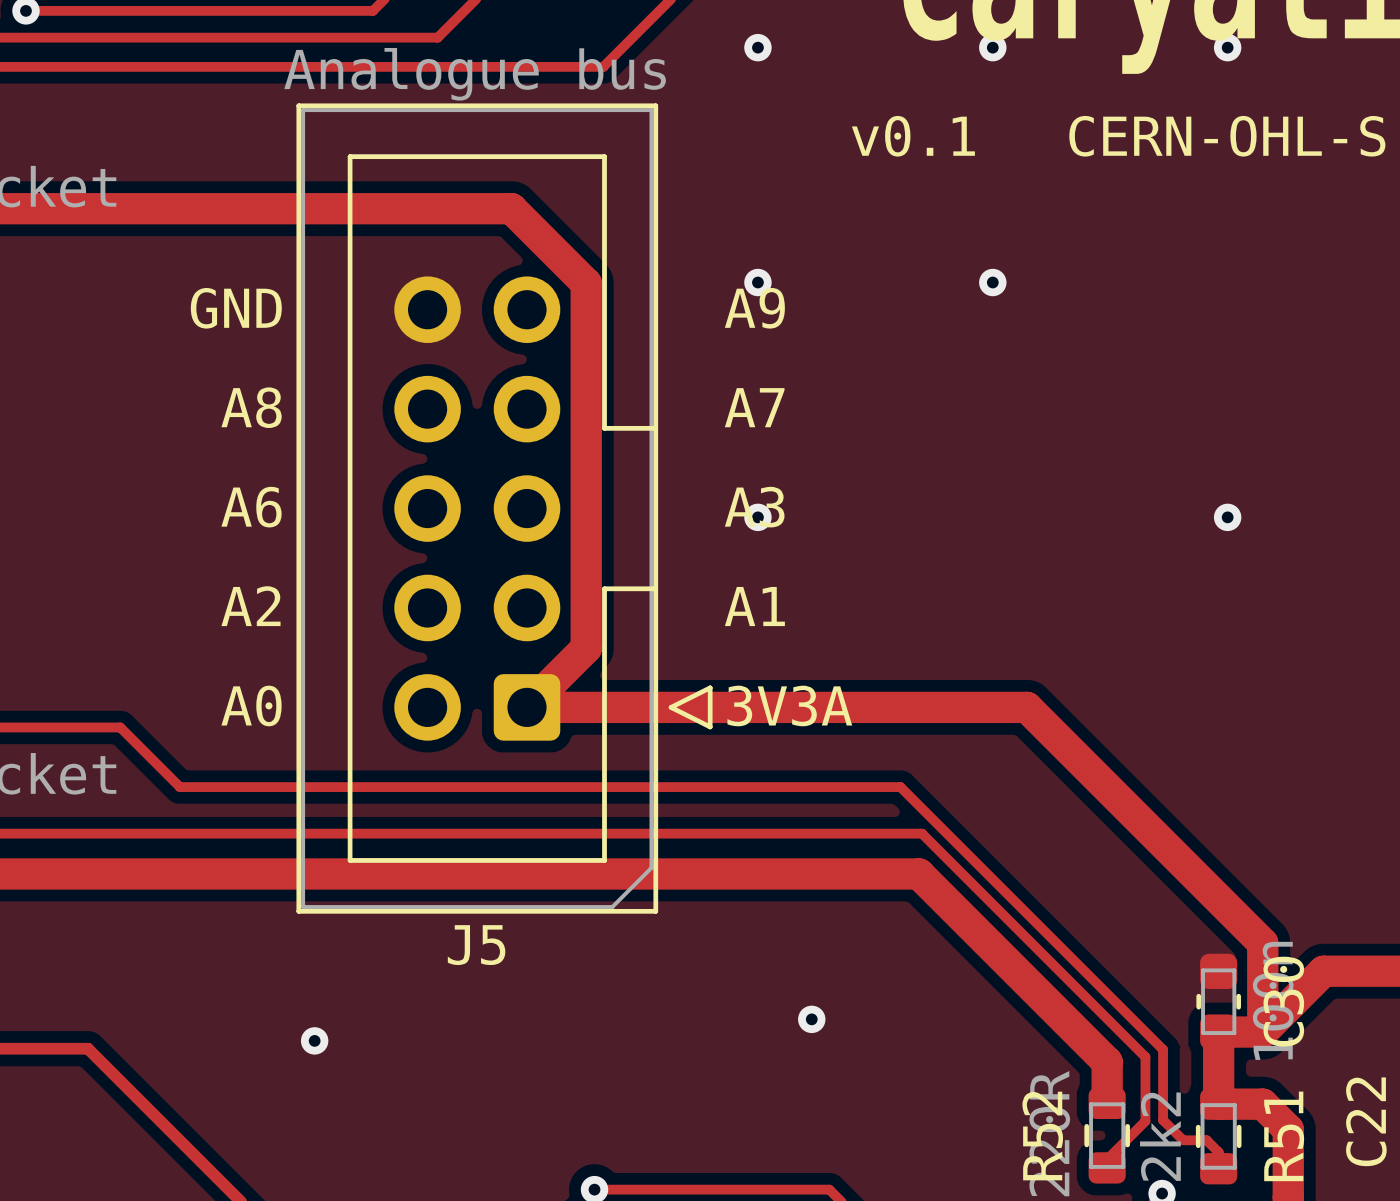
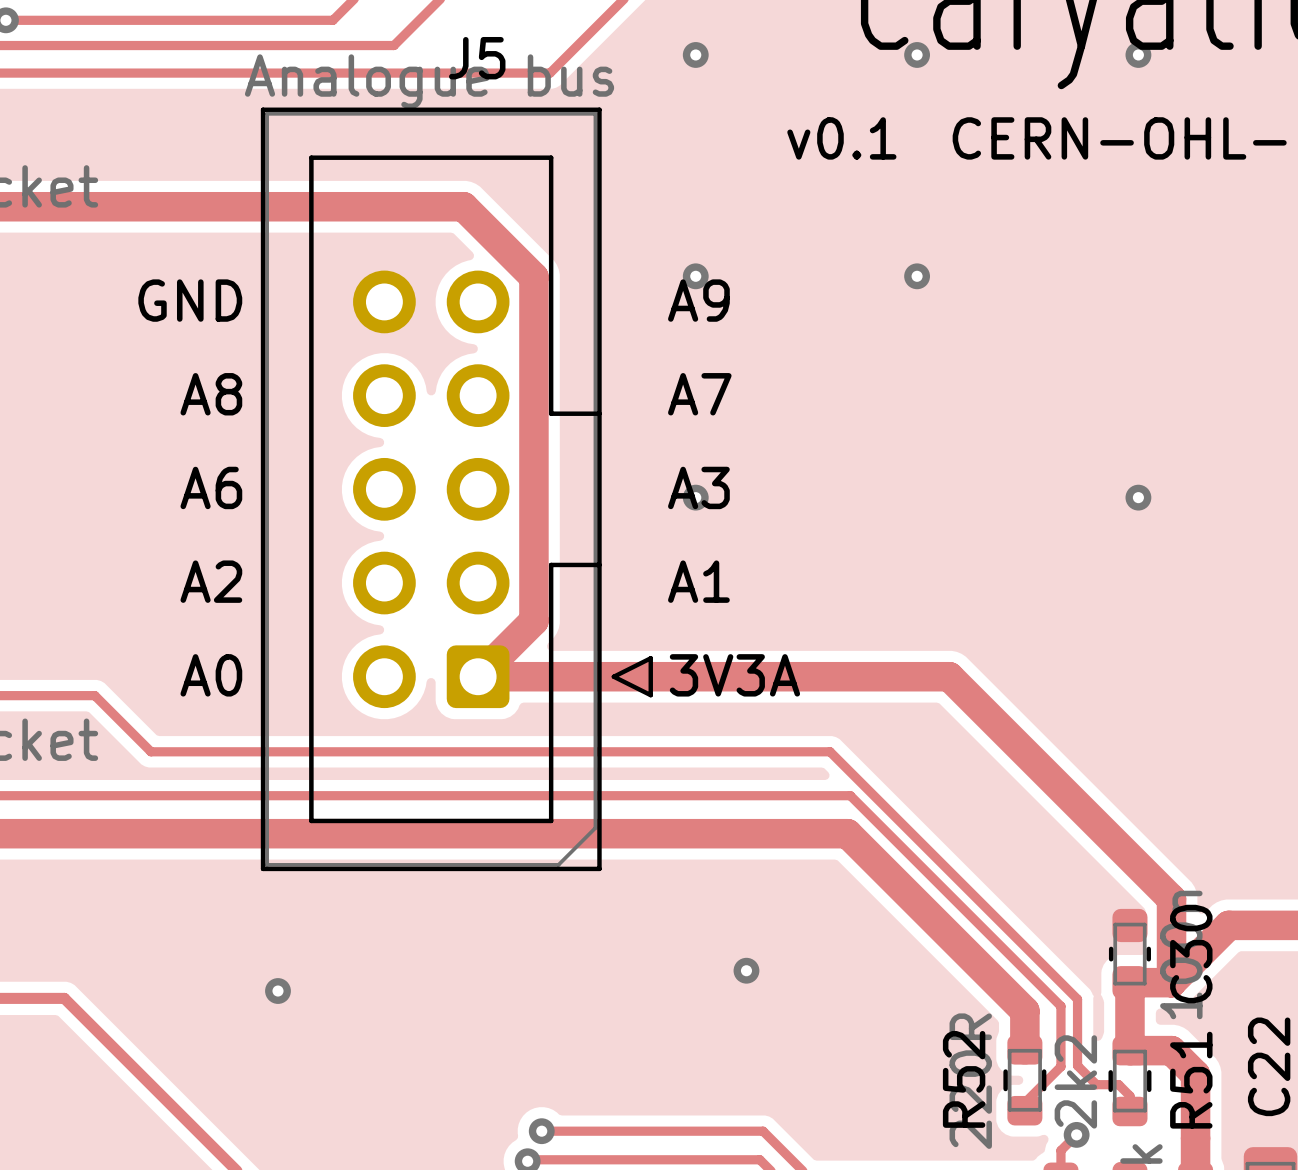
J5 name position: J5 (476, 945) -> J5 (477, 58)

